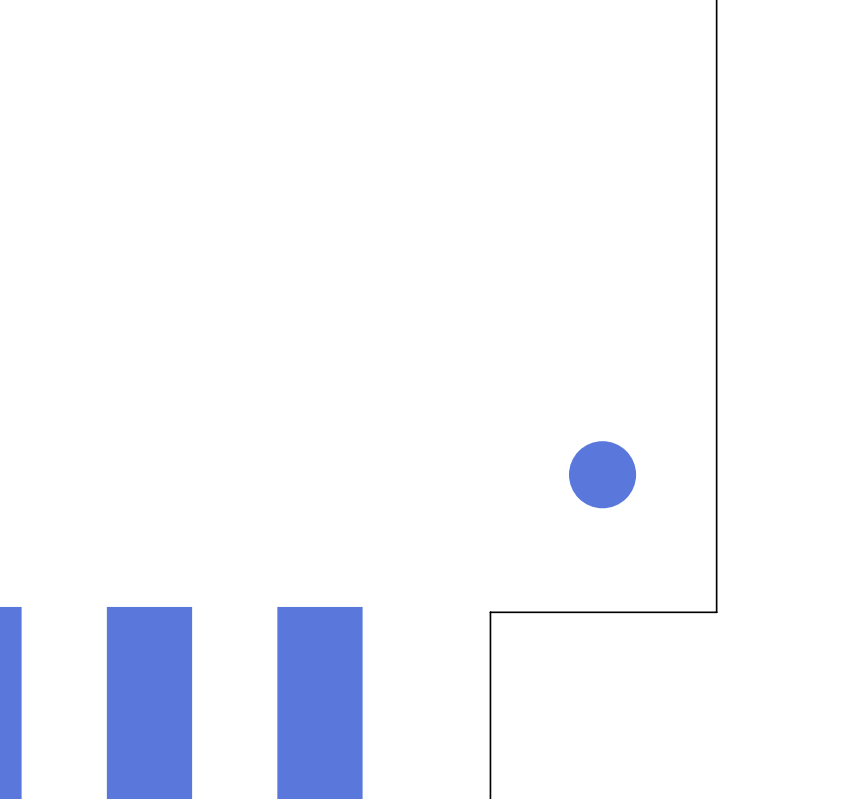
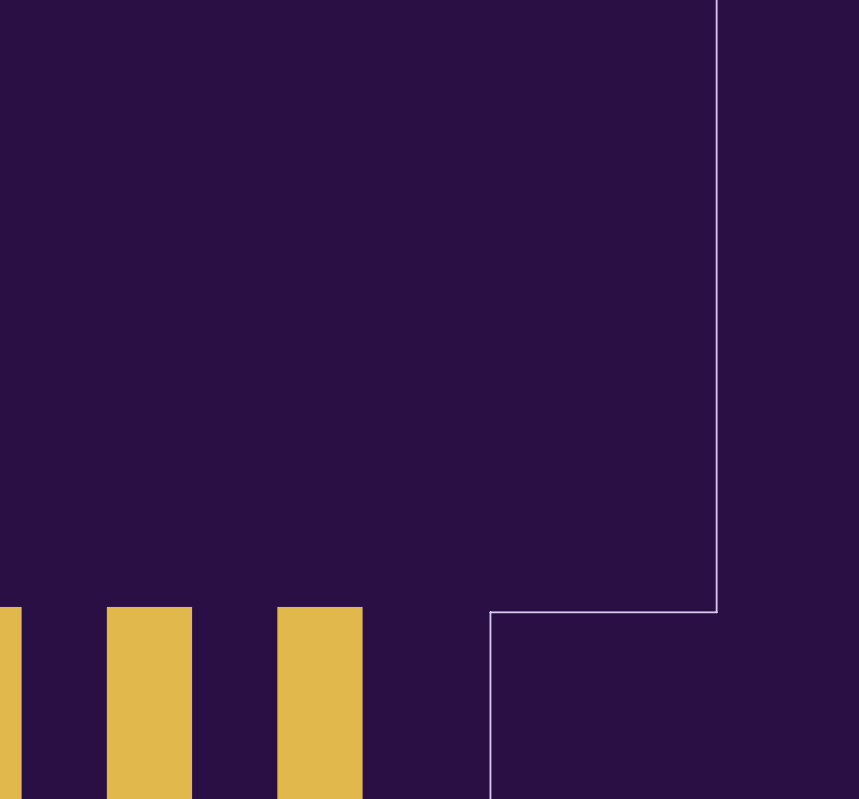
part: (602, 474) -> none

